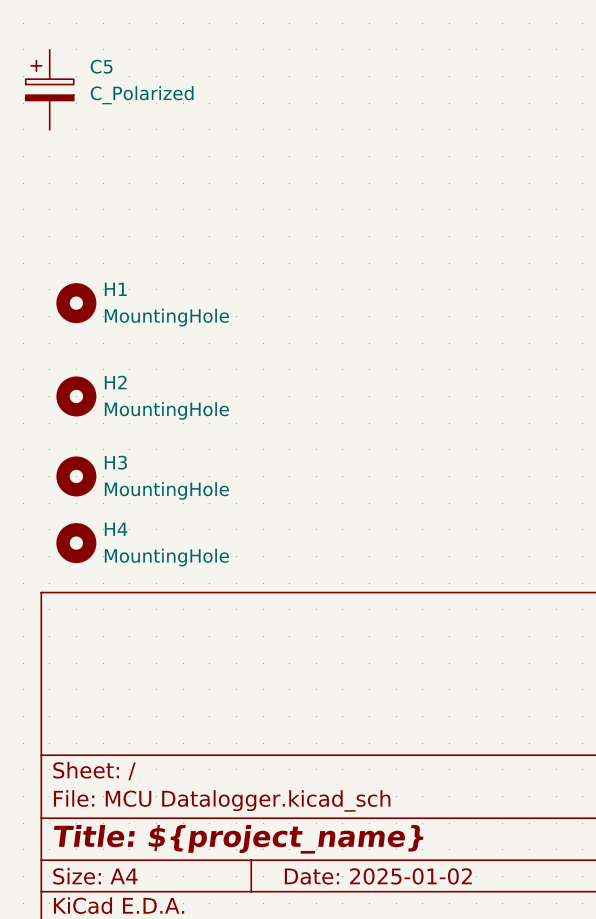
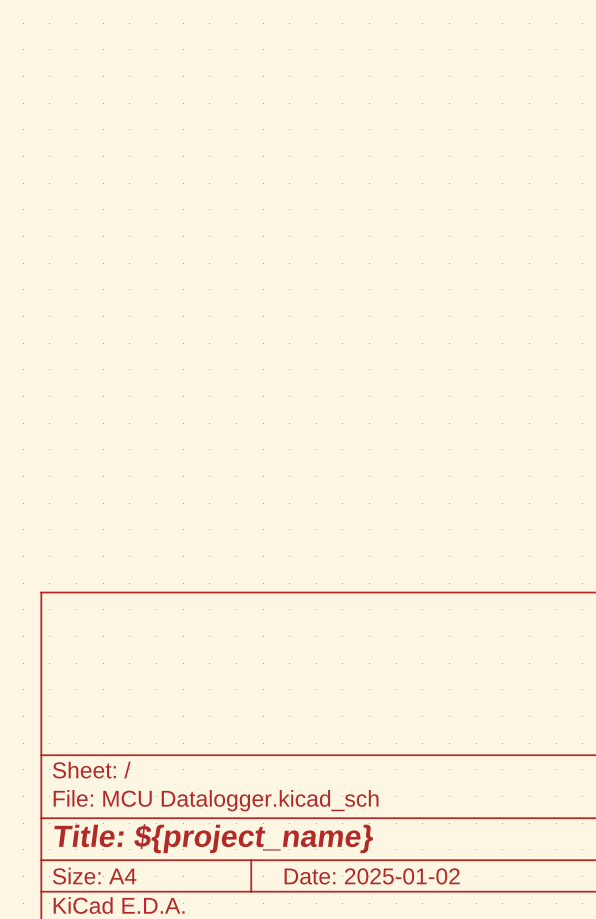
C5: C_Polarized (49, 89) -> none
H1: MountingHole (76, 303) -> none
H2: MountingHole (76, 396) -> none
H3: MountingHole (76, 476) -> none
H4: MountingHole (76, 543) -> none

